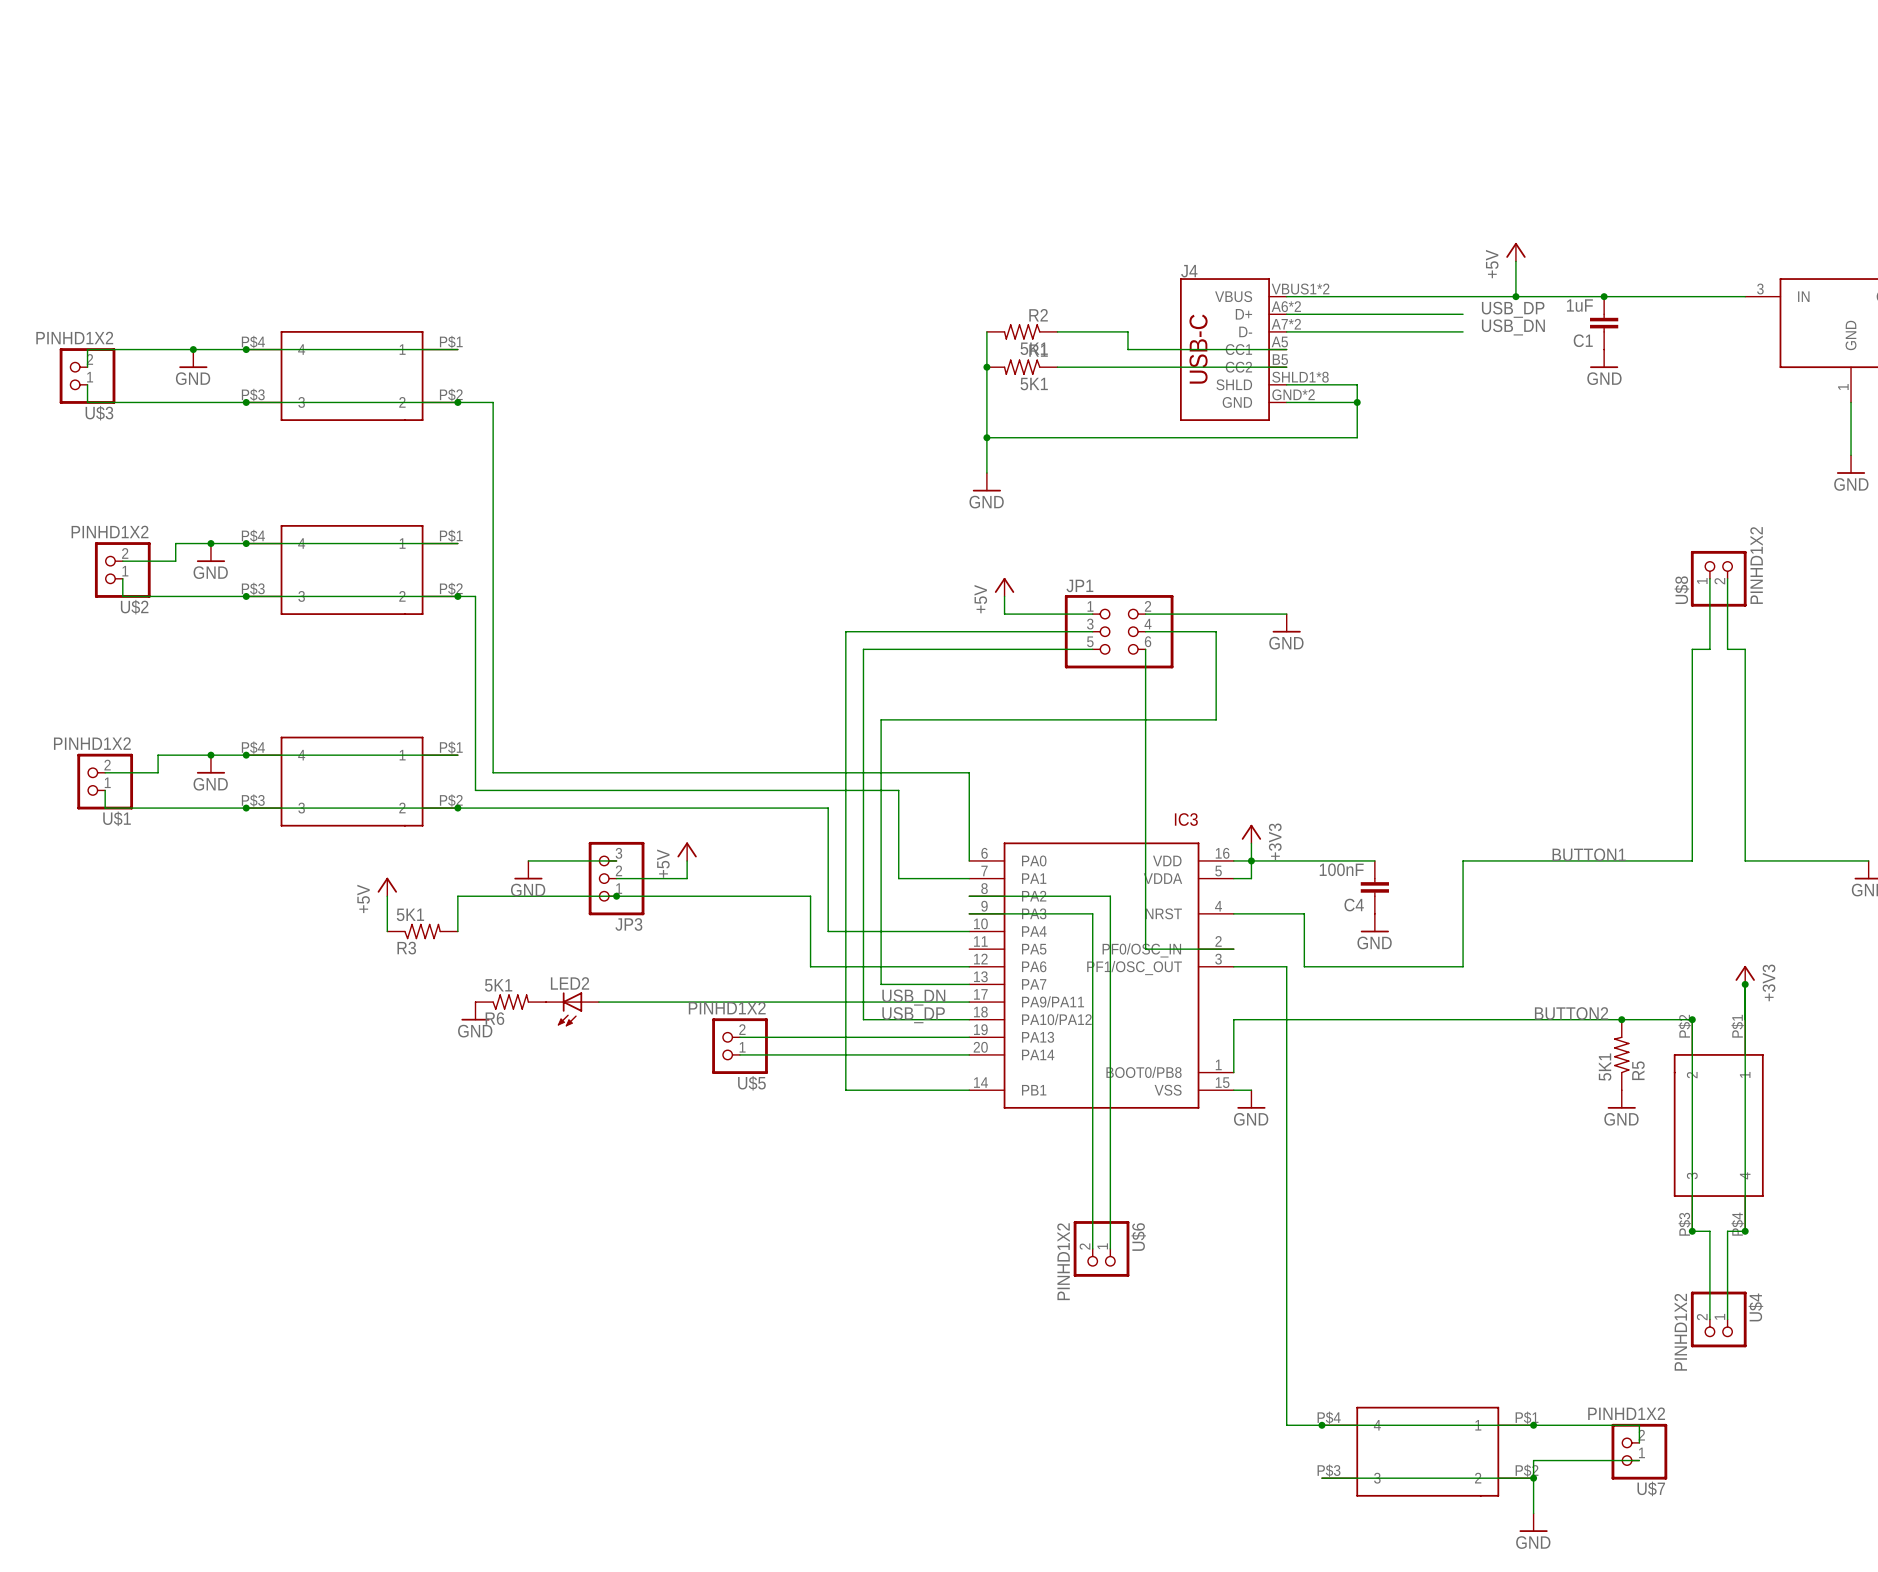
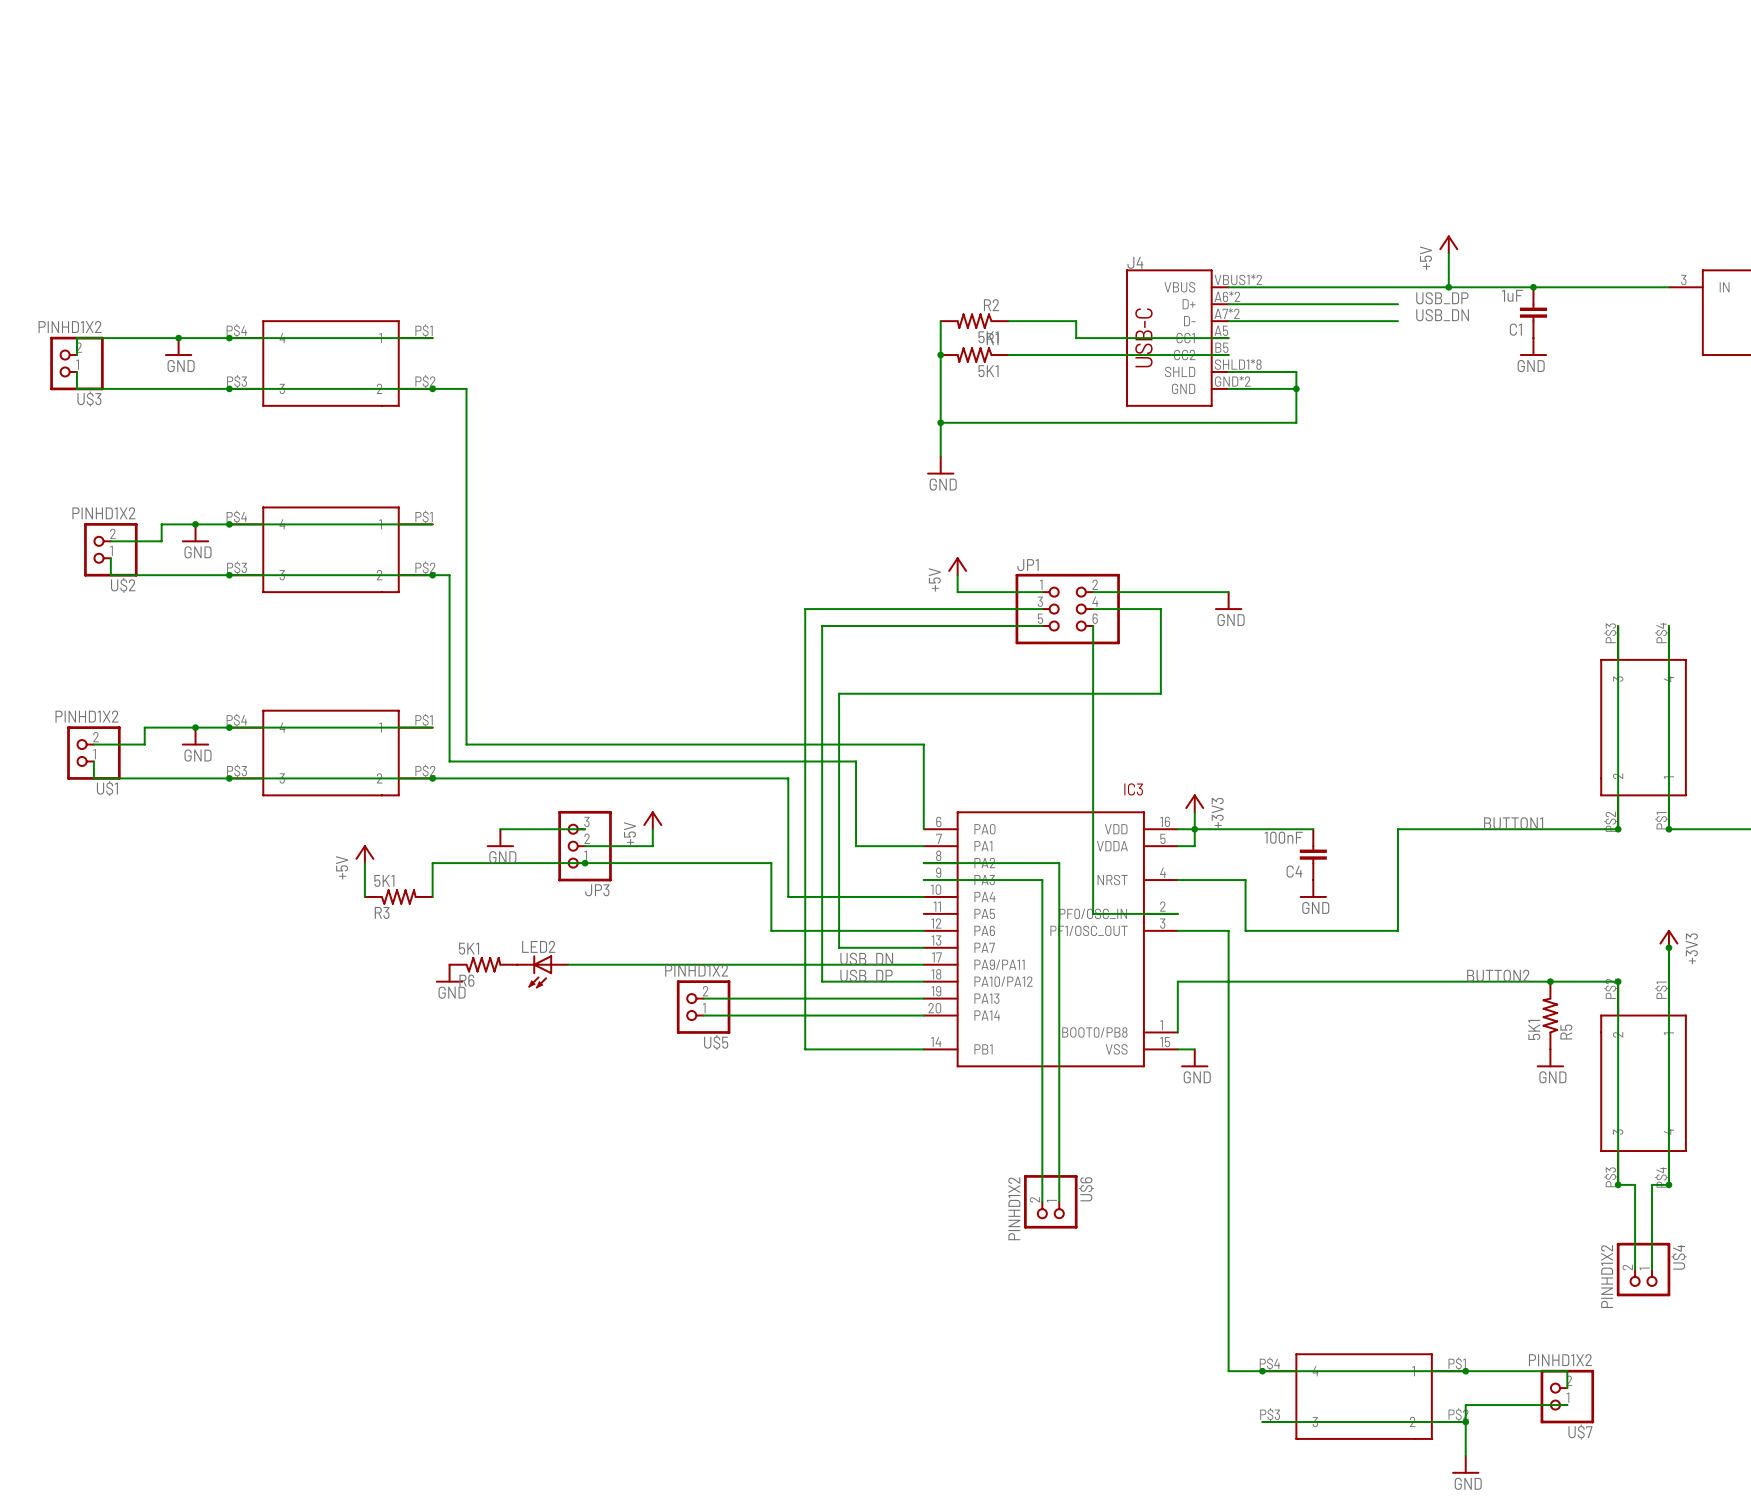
wire: (1709, 578) (1709, 649) (1692, 649) -> none
U$8: PINHD1X2 (1718, 578) -> none
wire: (1727, 578) (1727, 649) (1745, 649) -> none
part: none -> (1643, 727)
junction: none -> (1618, 829)
junction: none -> (1668, 829)

